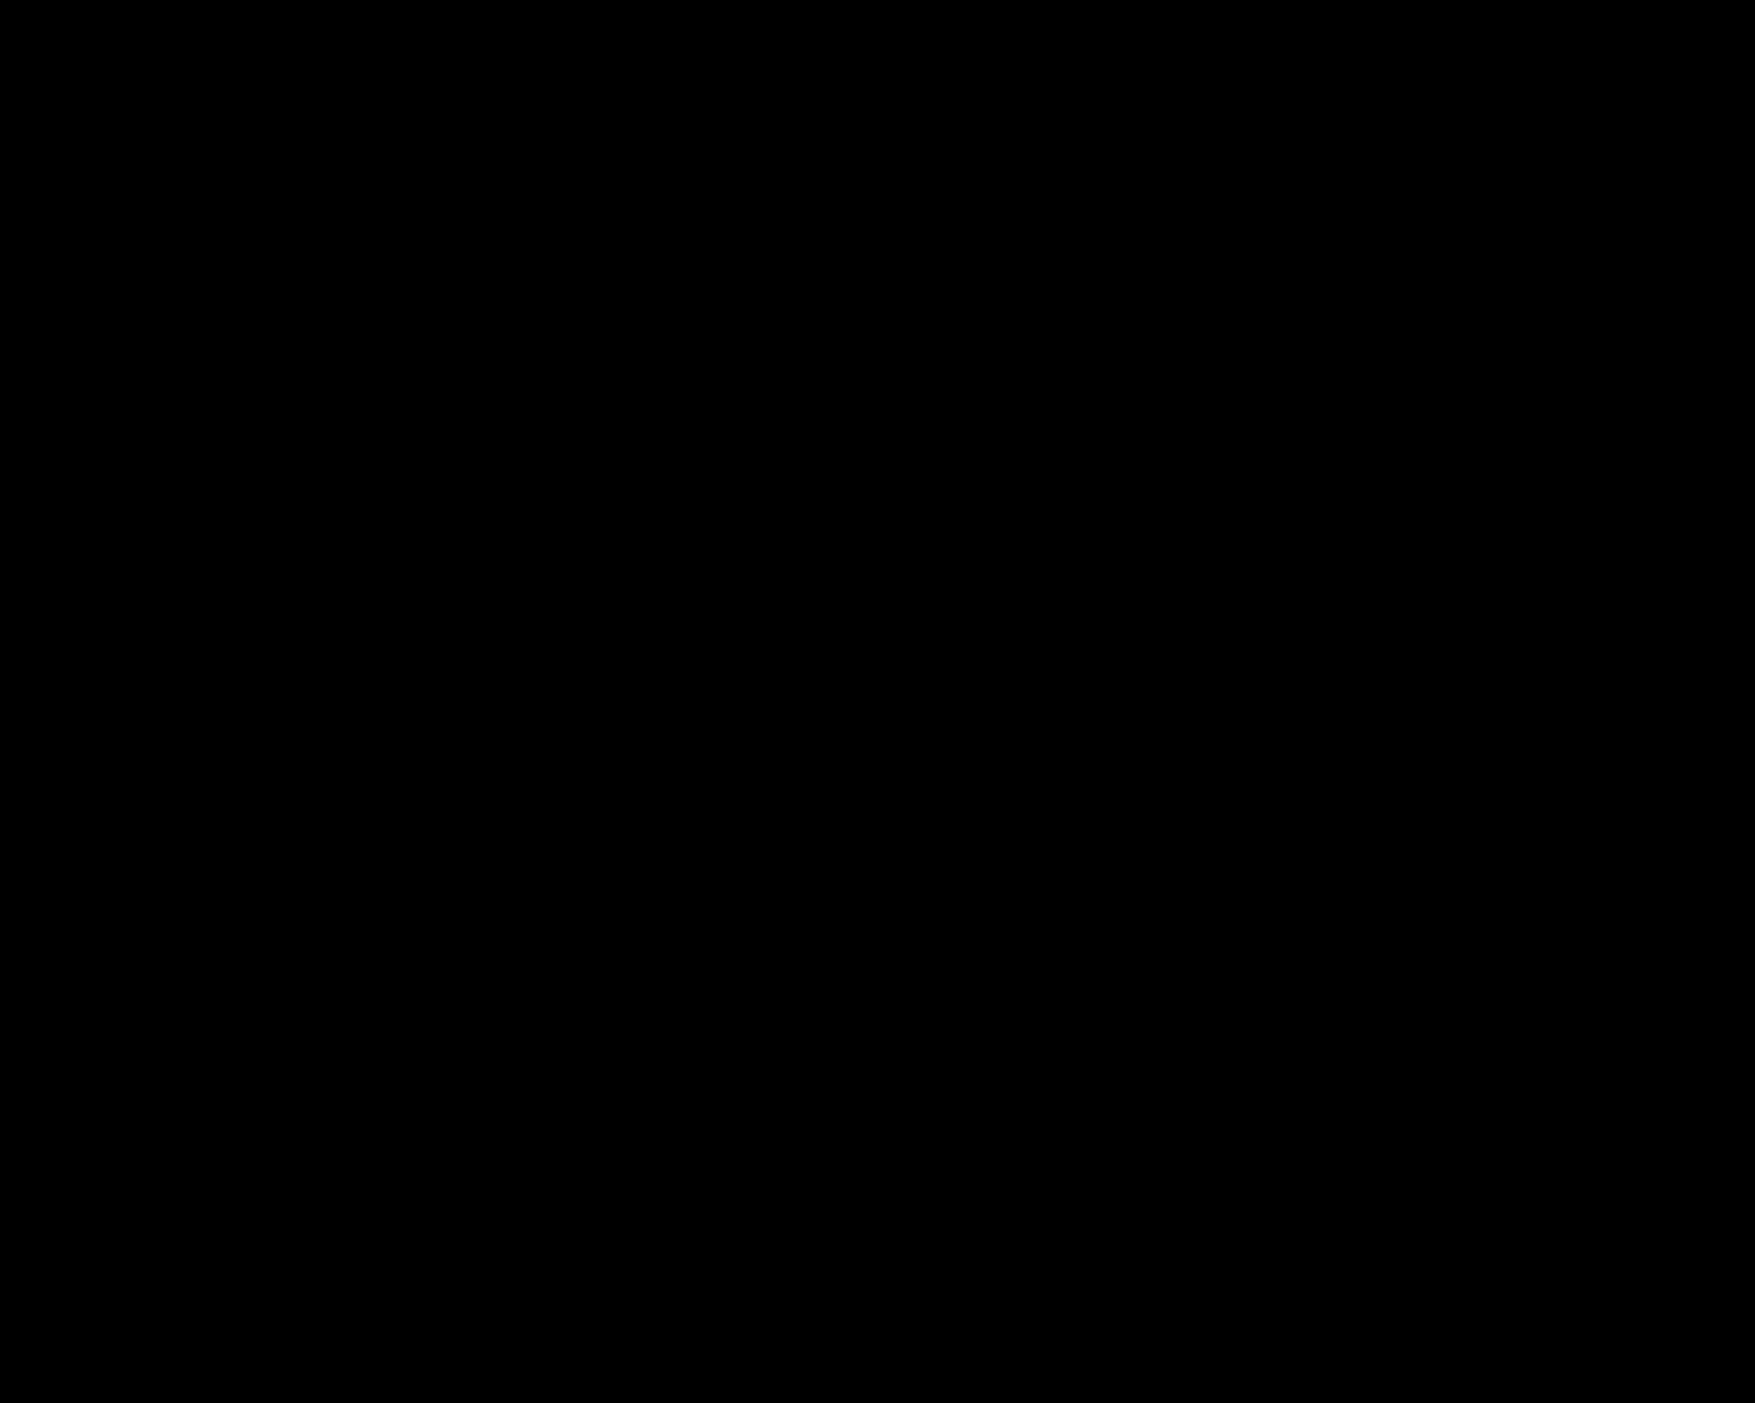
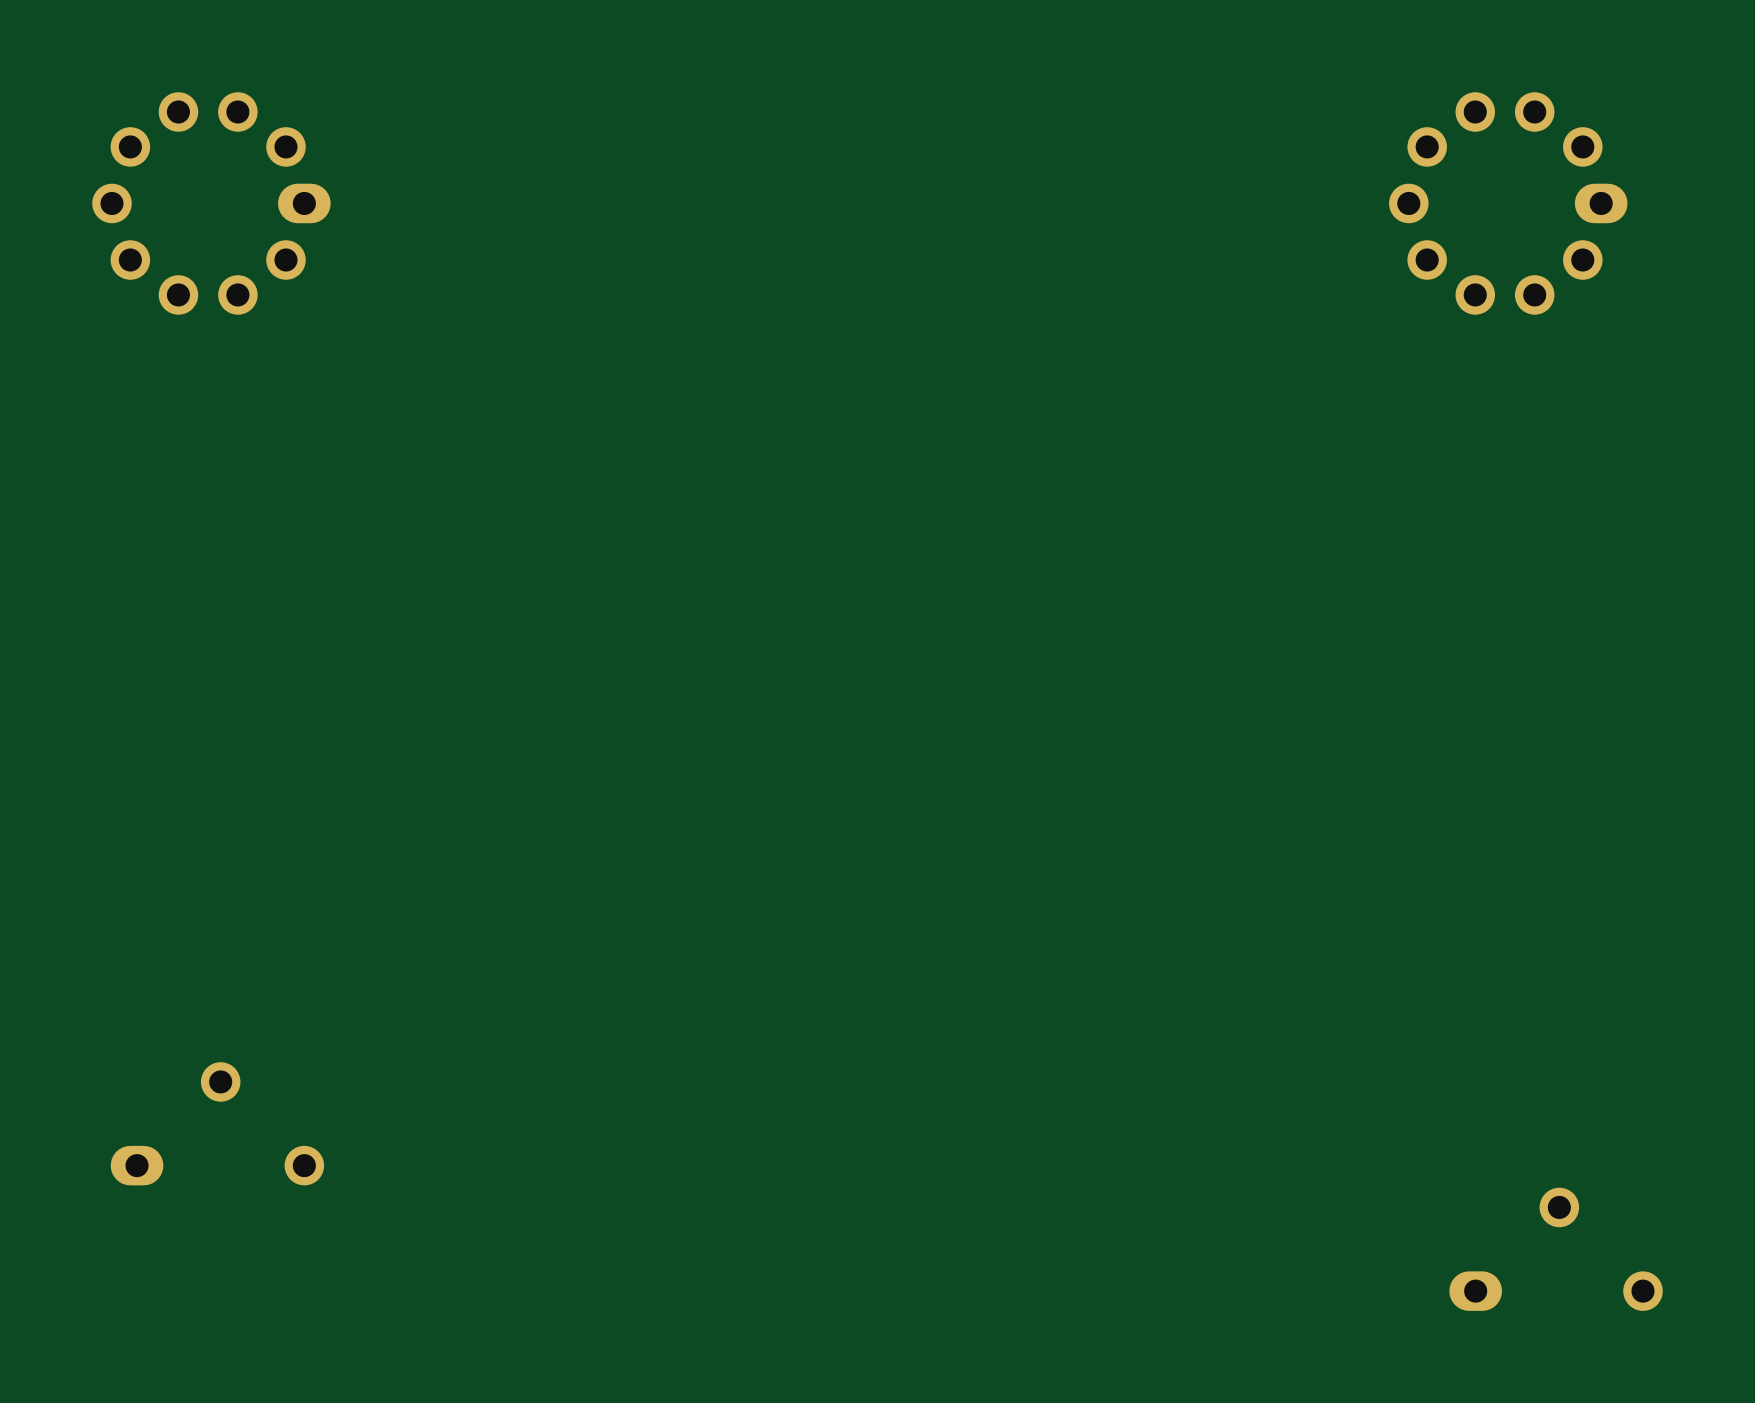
part: none -> (211, 203)
part: none -> (1508, 203)
part: none -> (217, 1123)
part: none -> (1556, 1249)

